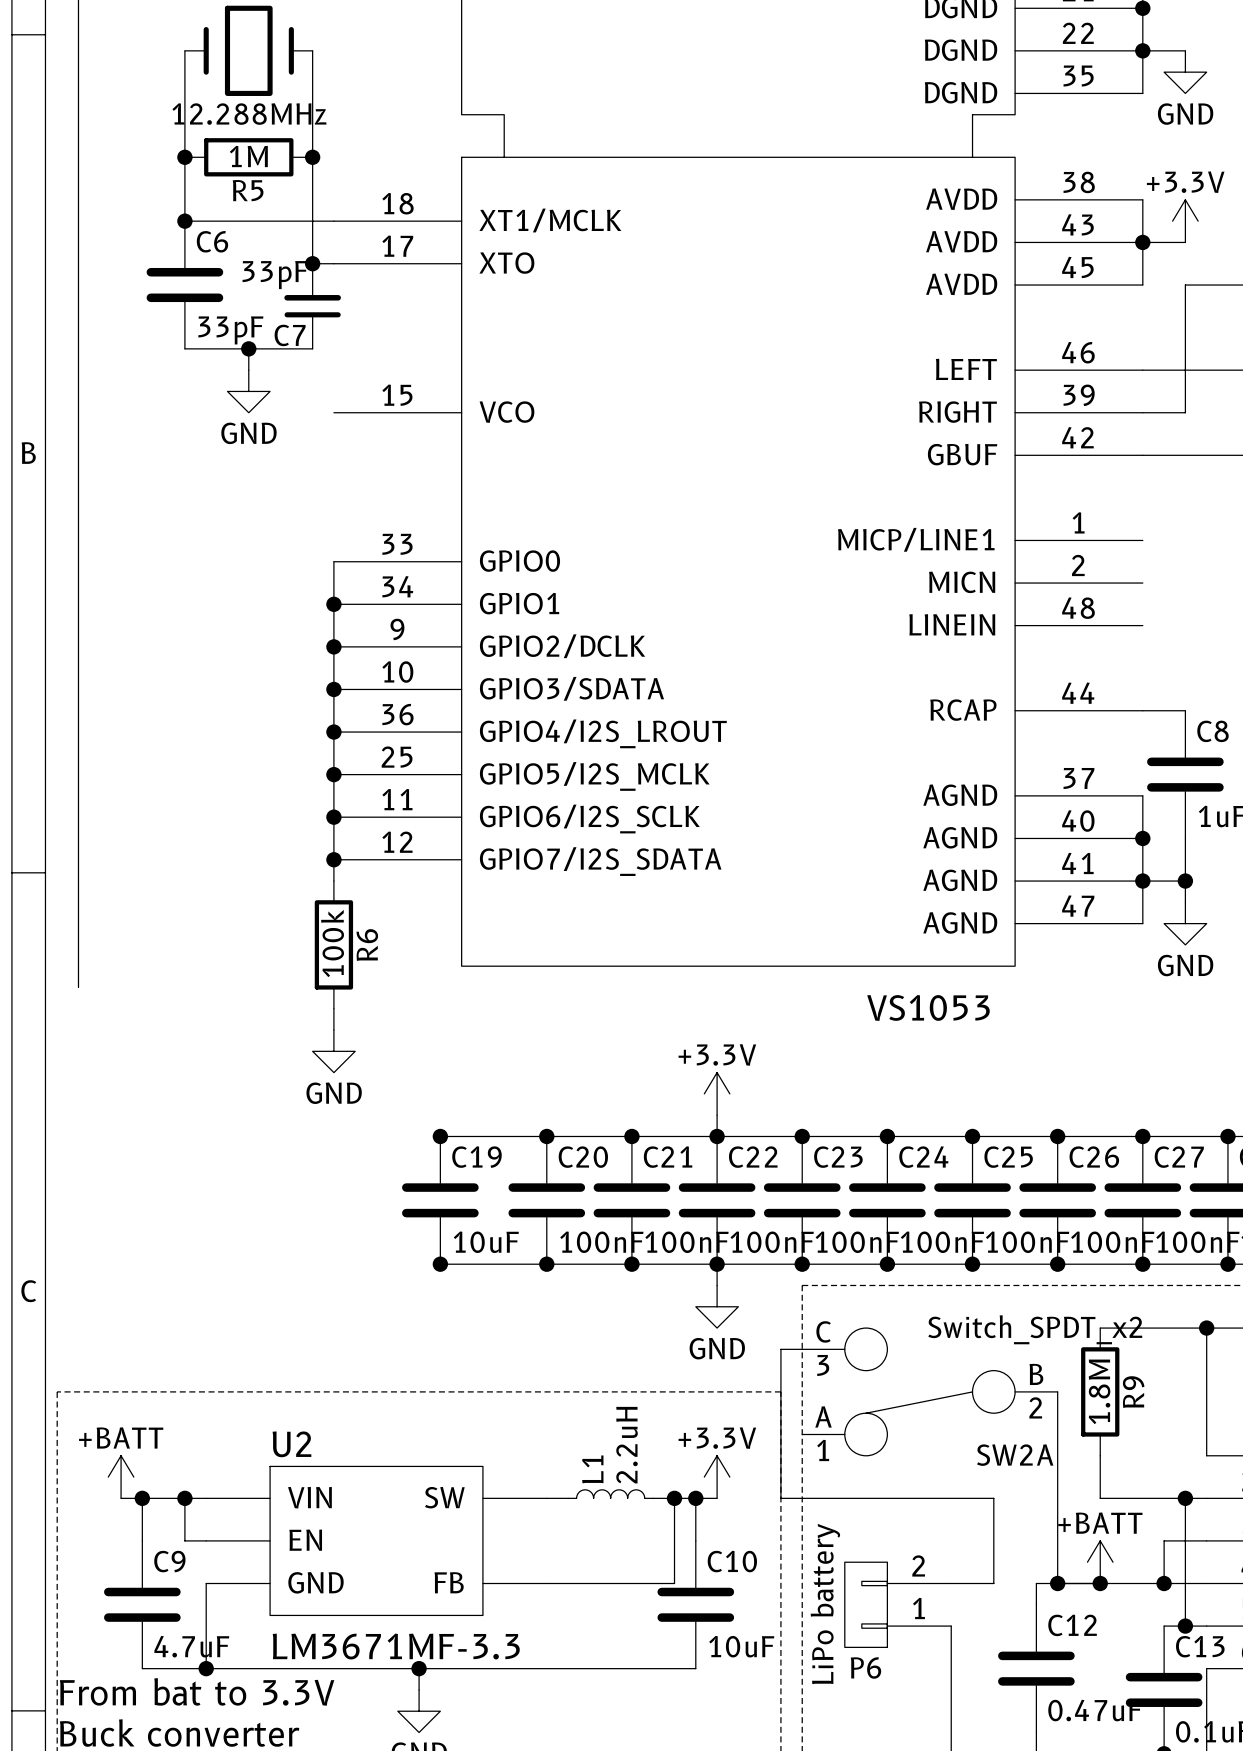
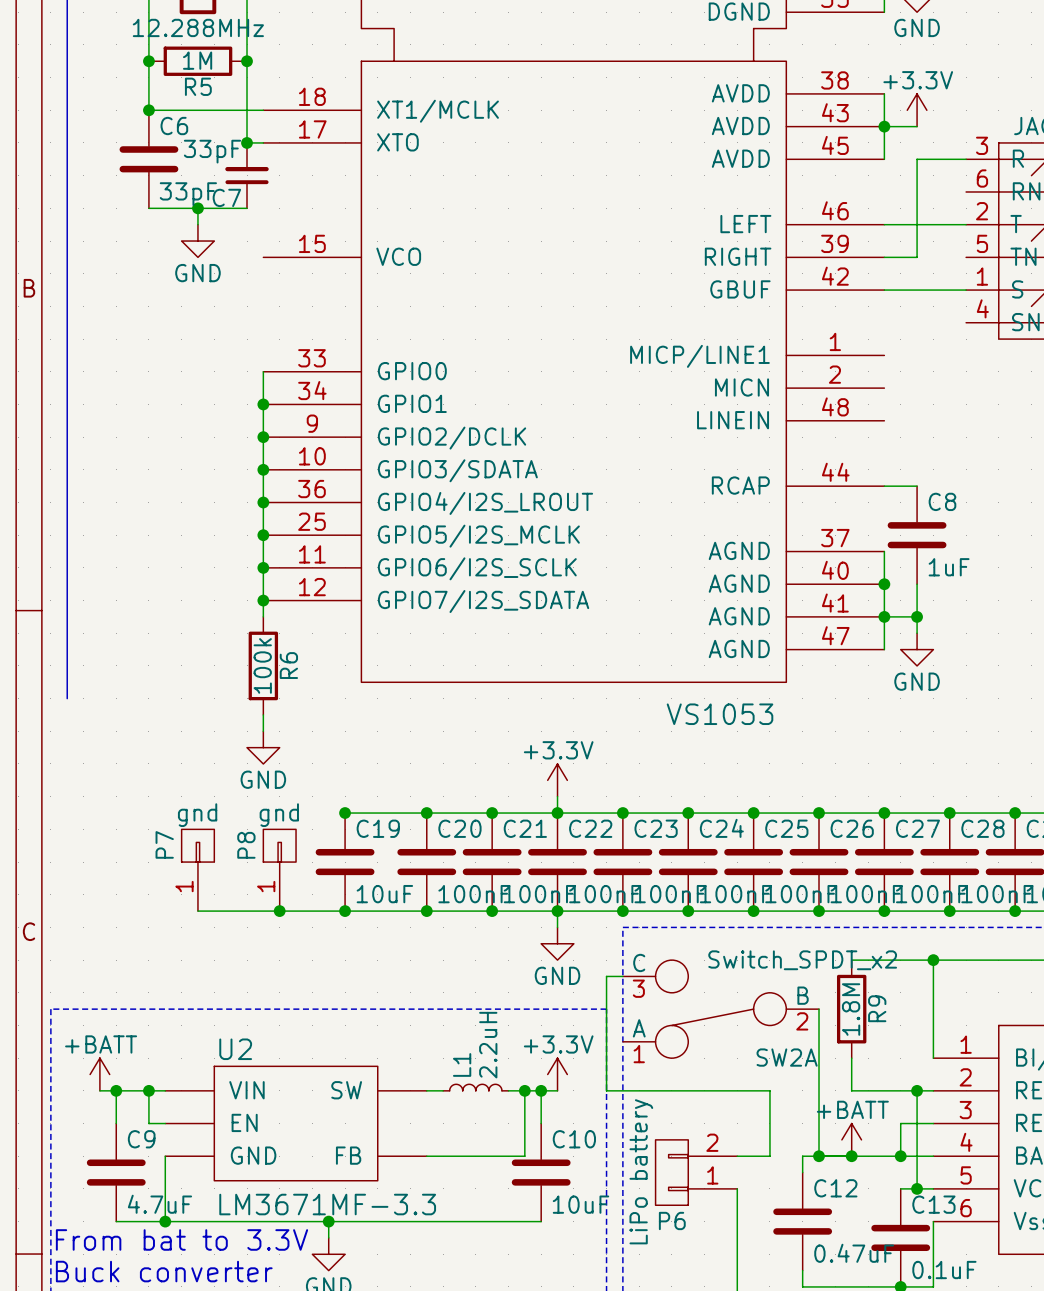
P7: none -> gnd (197, 870)
P8: none -> gnd (279, 870)
wire: none -> (197, 911) (345, 911)
junction: none -> (279, 911)

